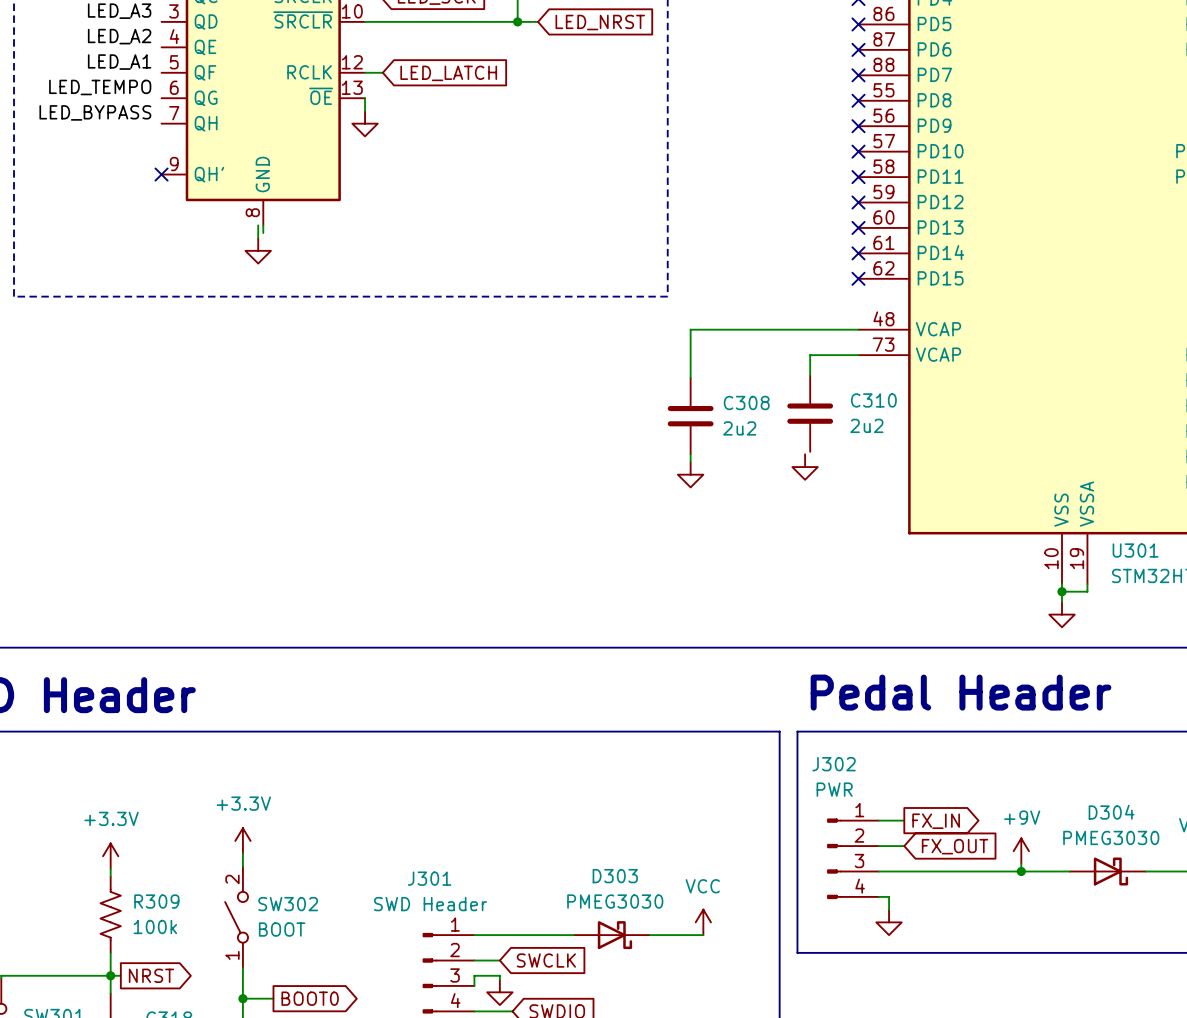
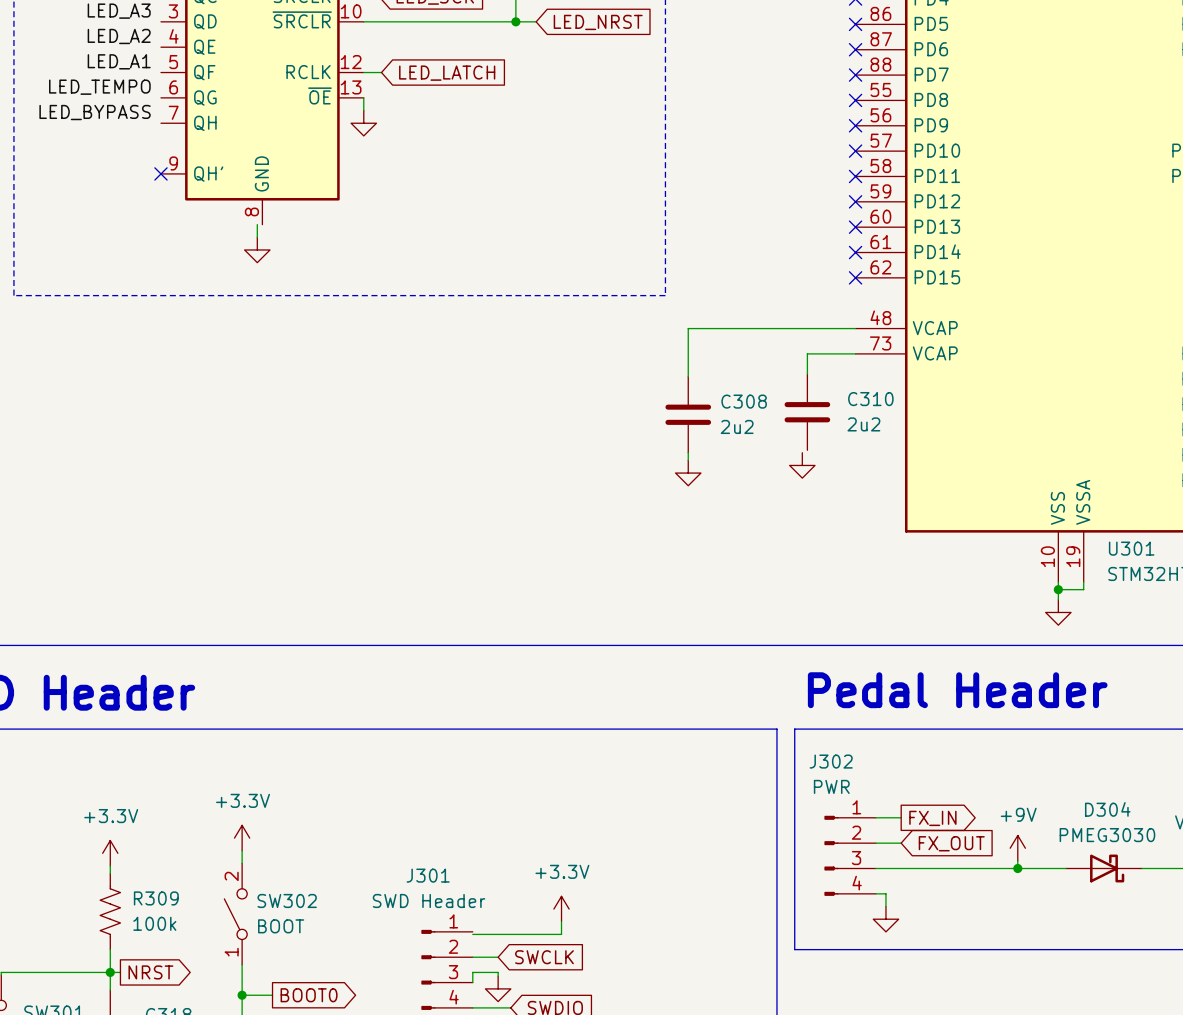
wire: (263, 225) (263, 233) -> none
power symbol: none -> +3.3V (561, 909)
power symbol: VCC (703, 922) -> none
wire: none -> (561, 921) (561, 934) (472, 934)
wire: (474, 935) (573, 935) -> none
D303: PMEG3030 (611, 935) -> none
wire: (649, 935) (703, 935) -> none

